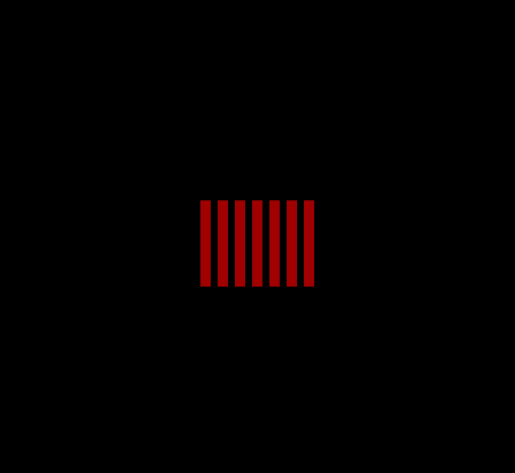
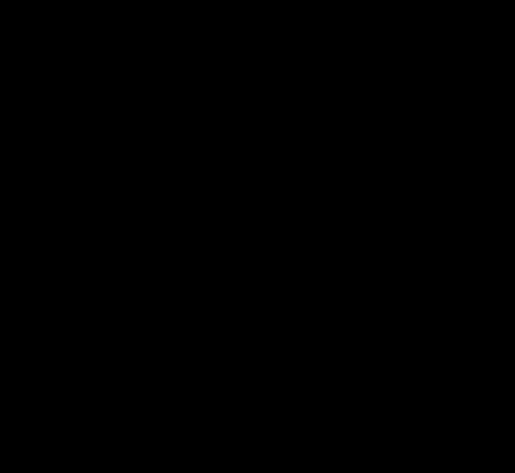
part: (257, 243) -> none

